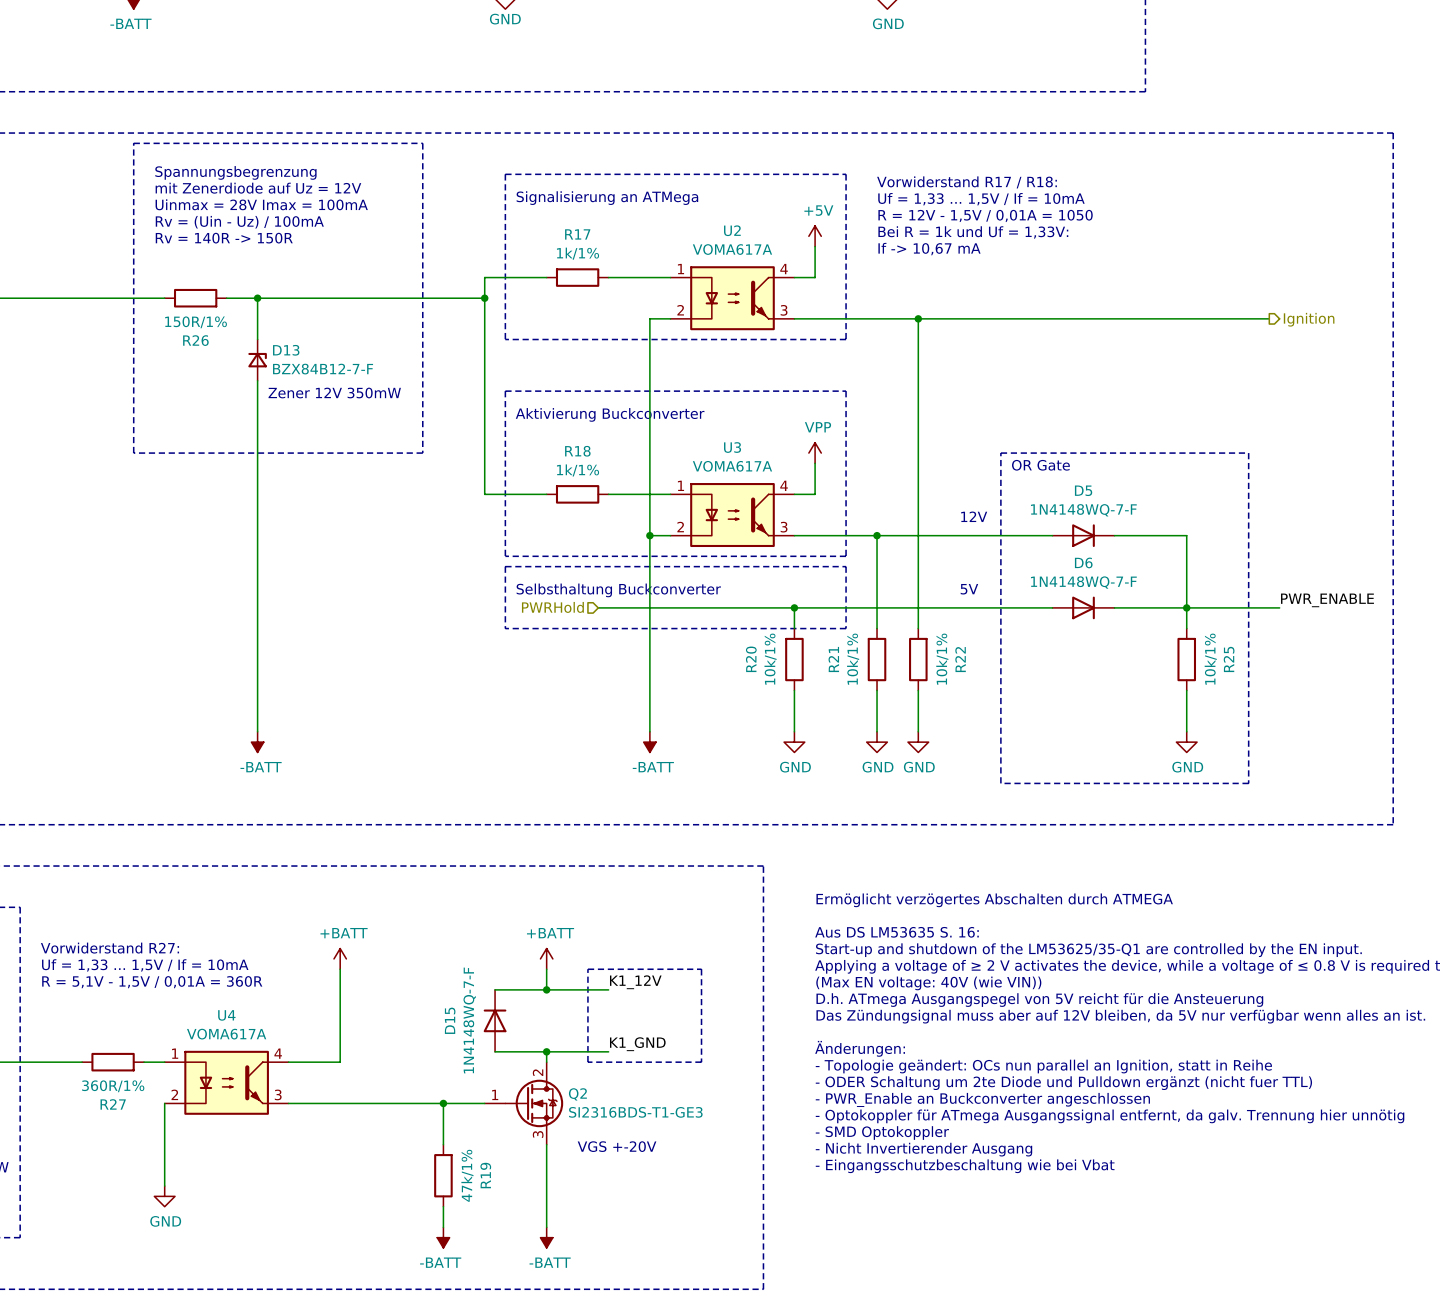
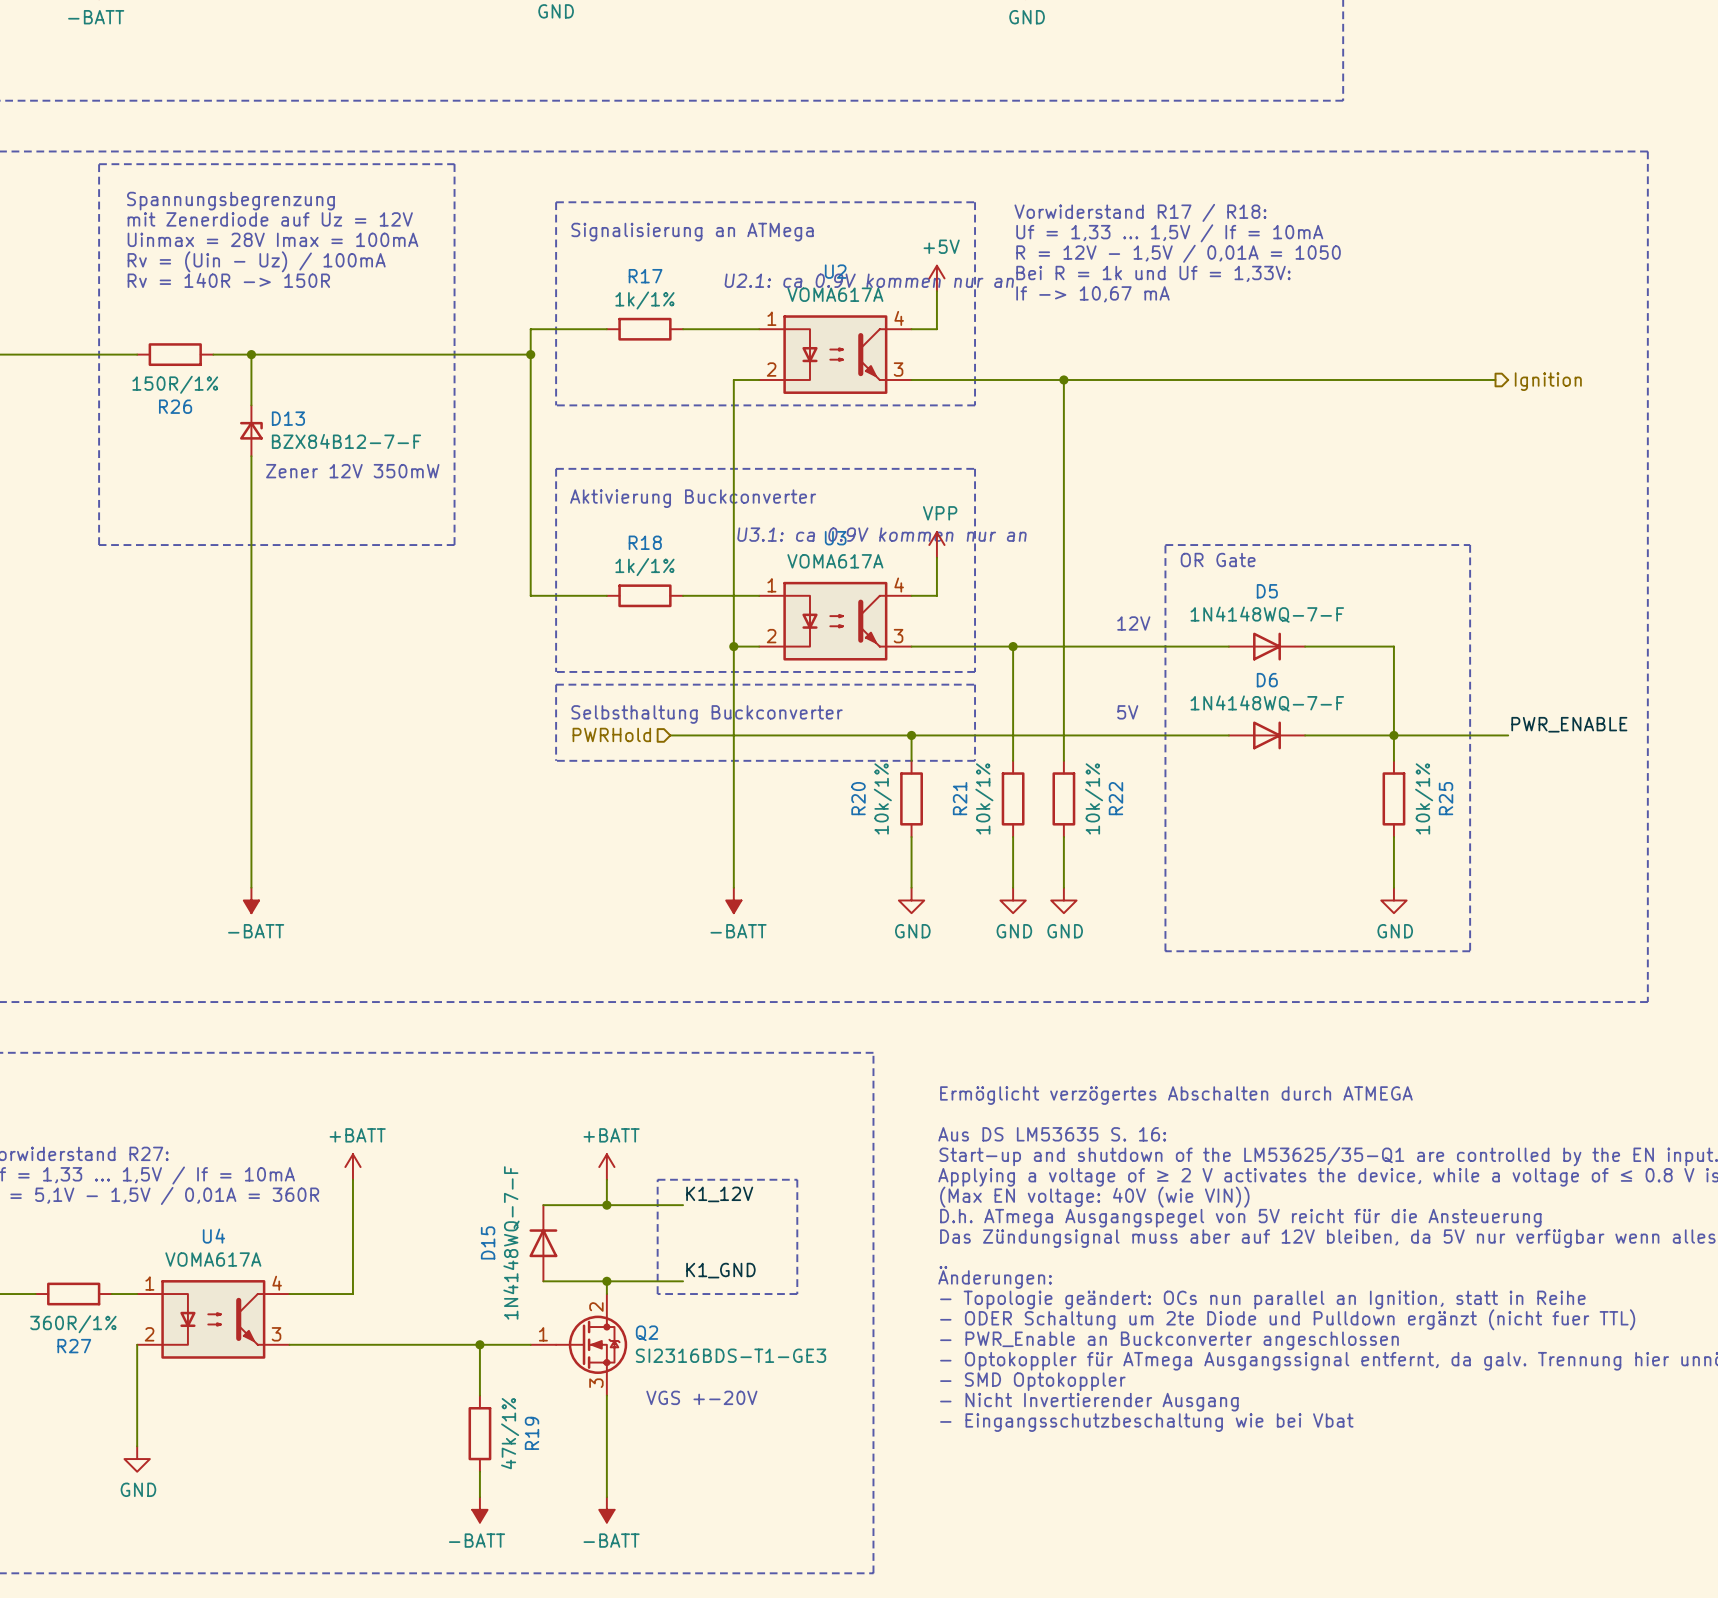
text: none -> U2.1: ca 0.9V kommen nur an (869, 280)
text: none -> U3.1: ca 0.9V kommen nur an (881, 534)

